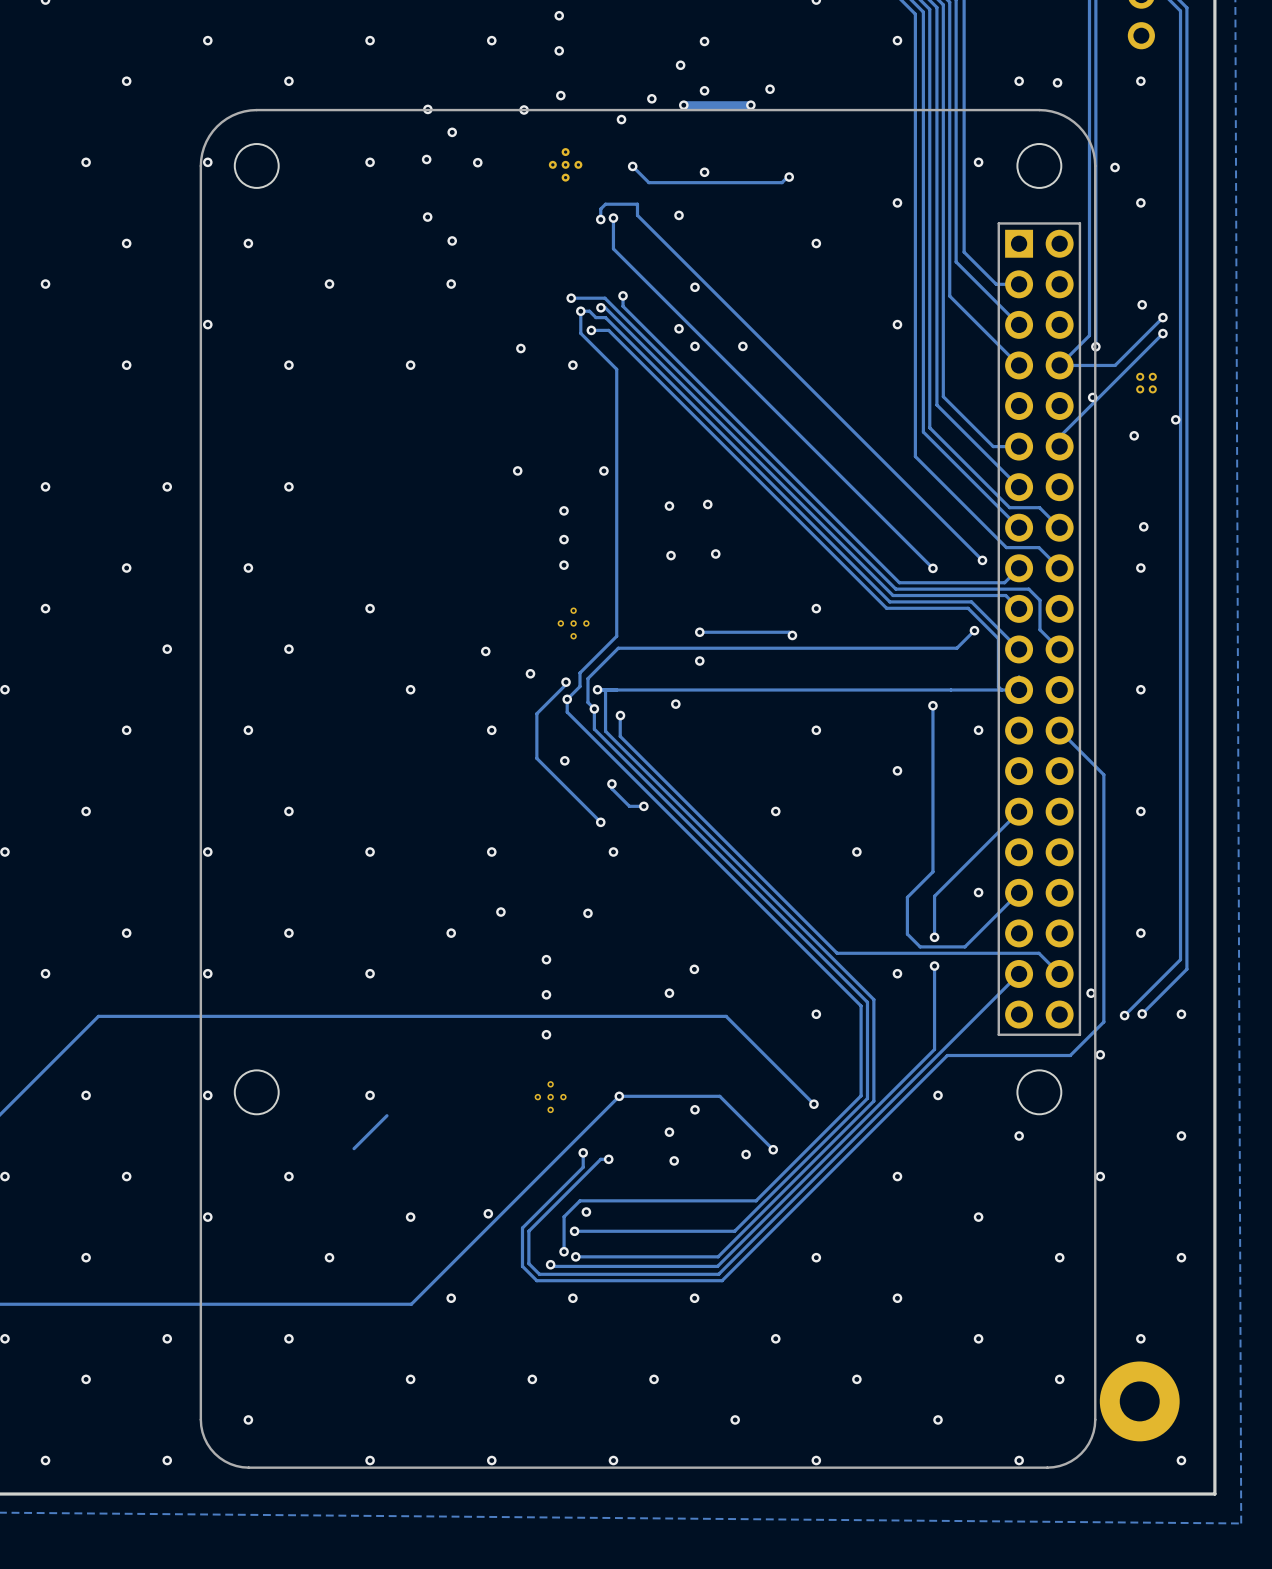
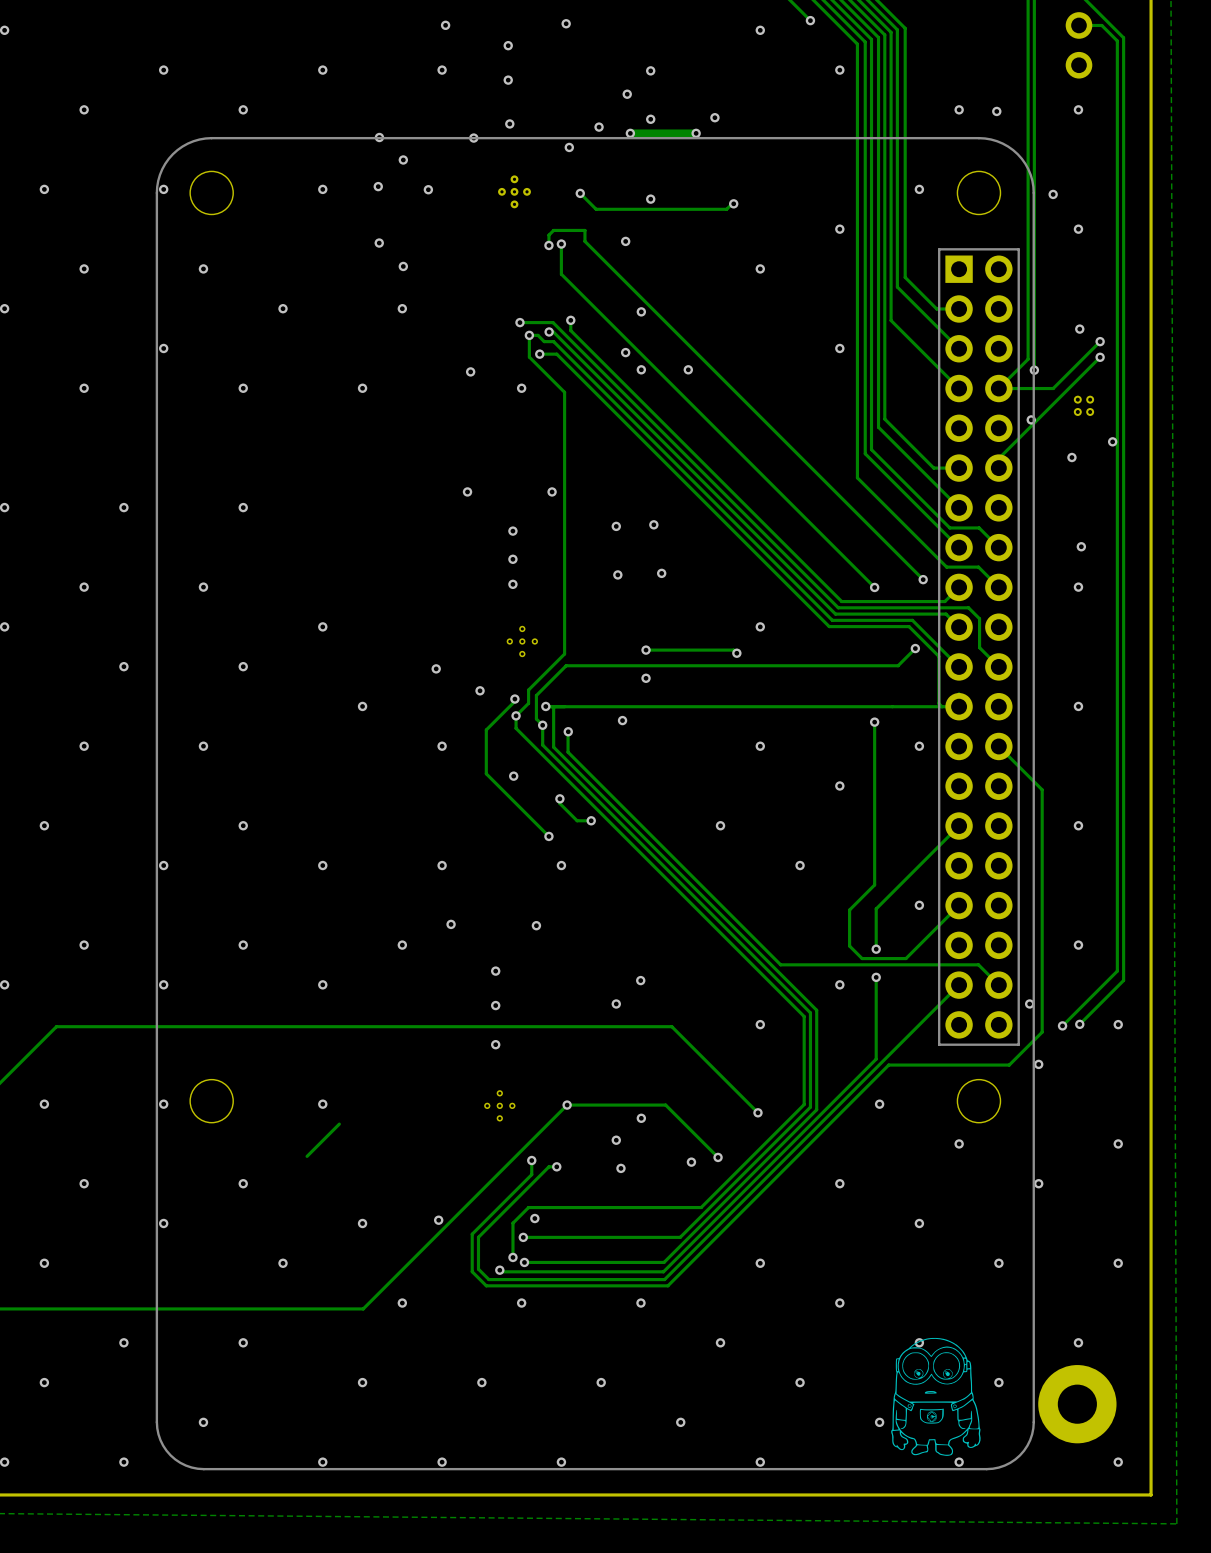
drawing: none -> [891, 1337, 981, 1456]

